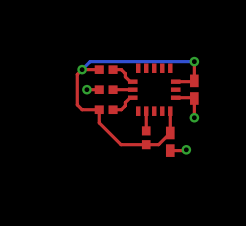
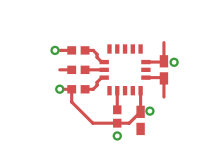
bottom track: (194, 61) (90, 61) (82, 69) -> none
via: (194, 61) -> none
top track: (87, 69) (82, 69) (77, 74) (77, 104) (82, 109) (87, 109) -> none
via: none -> (174, 62)
via position: (86, 89) -> (59, 89)
via: (194, 117) -> none
via: none -> (149, 111)
top track: (186, 149) (170, 150) -> none
via: (186, 149) -> none
via: none -> (117, 135)

